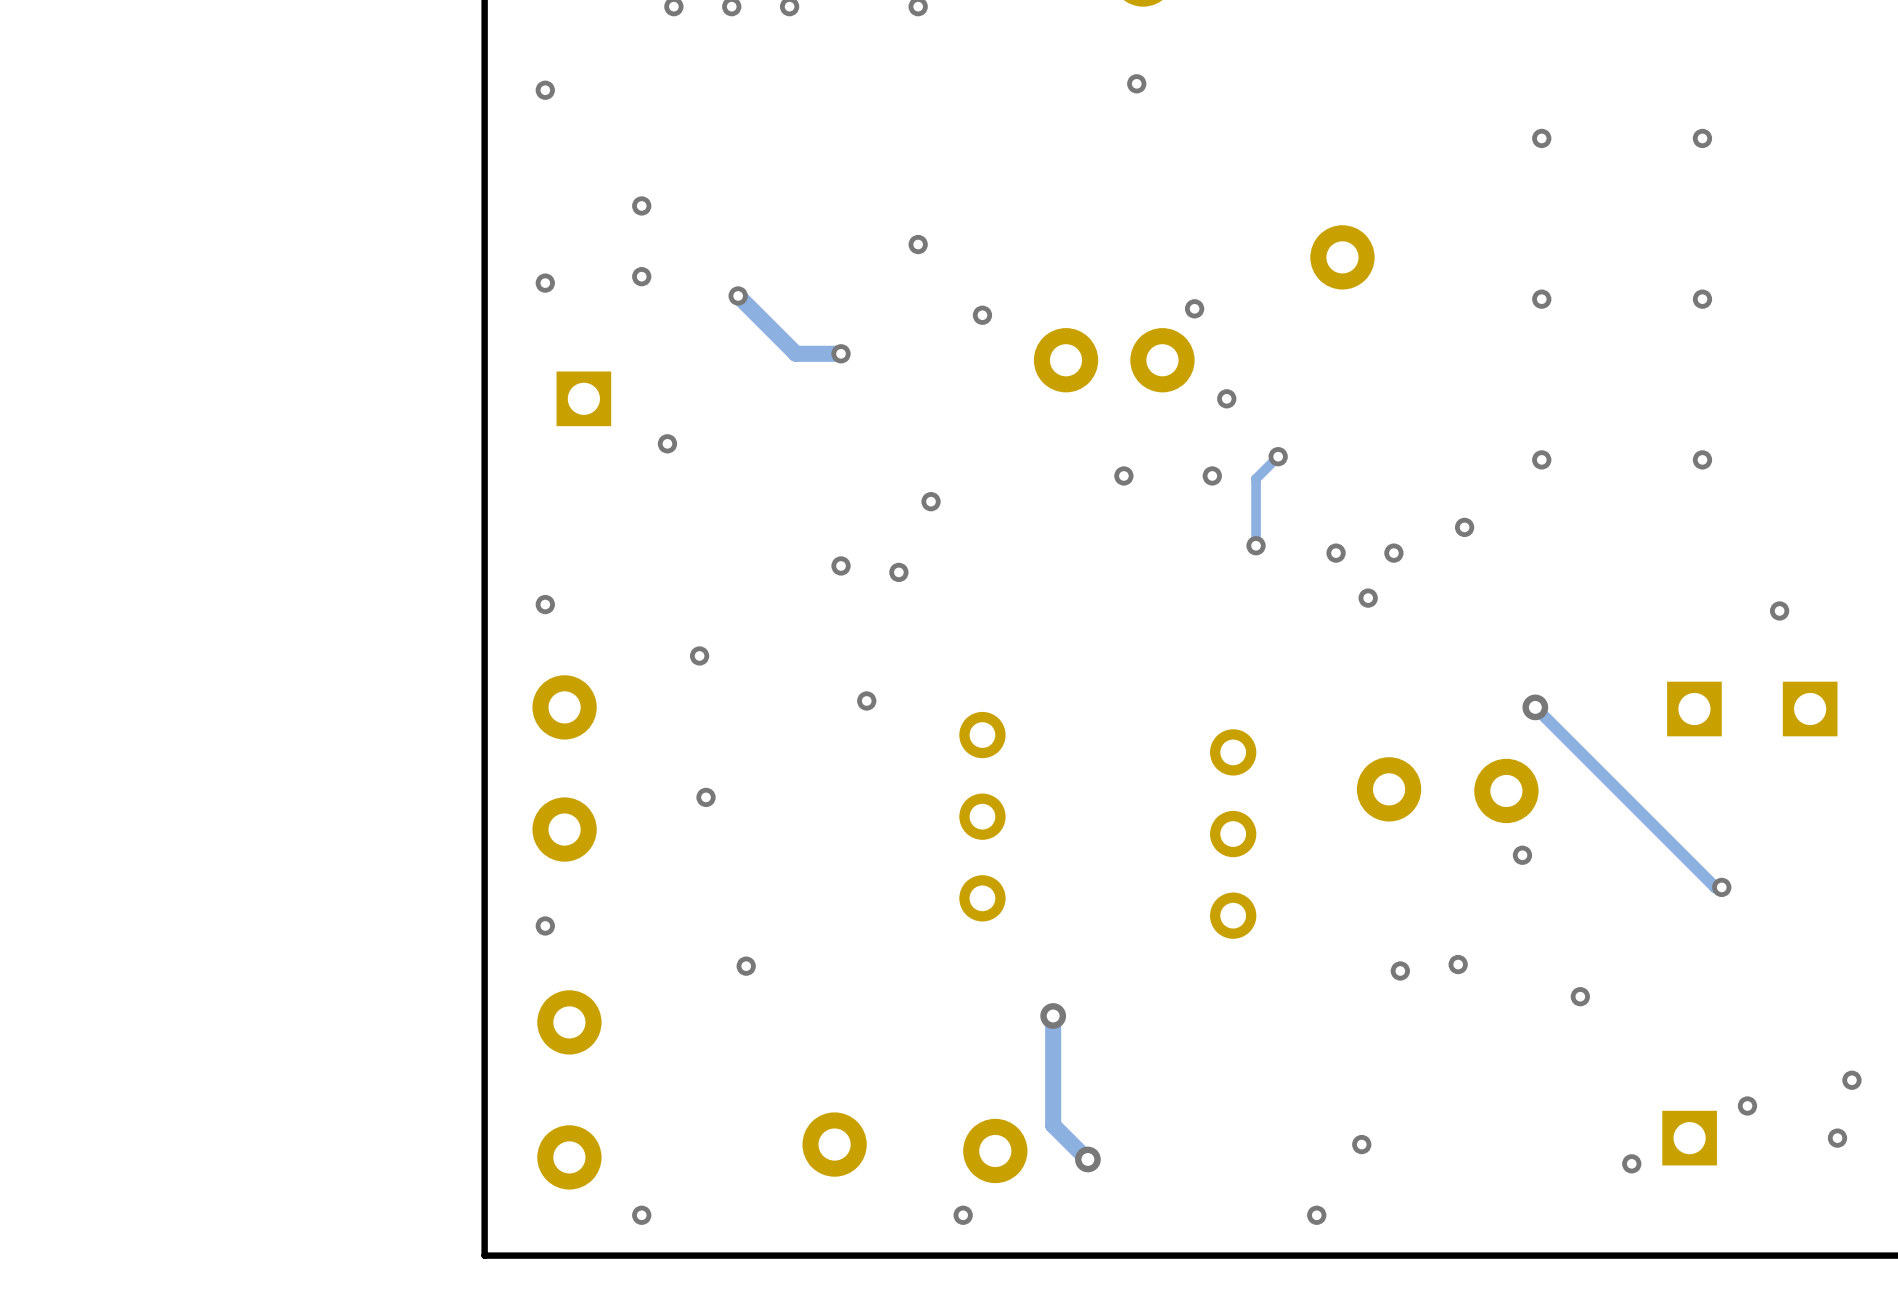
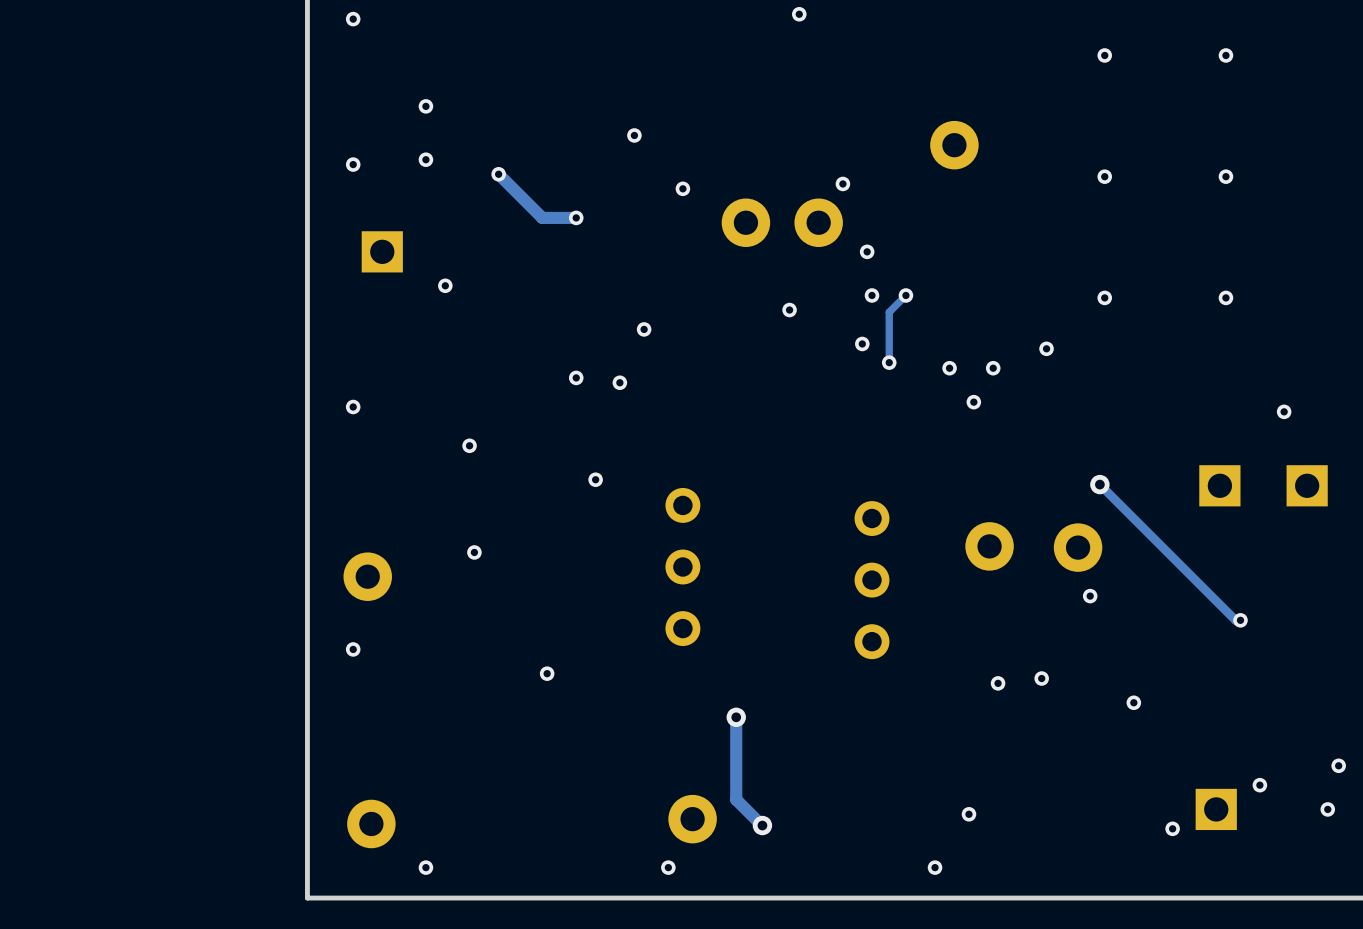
via: none -> (872, 295)
via: (1212, 475) -> none
via: none -> (862, 343)
part: (564, 707) -> none
via position: (746, 966) -> (547, 673)
part: (569, 1022) -> none
part: (834, 1144) -> none

